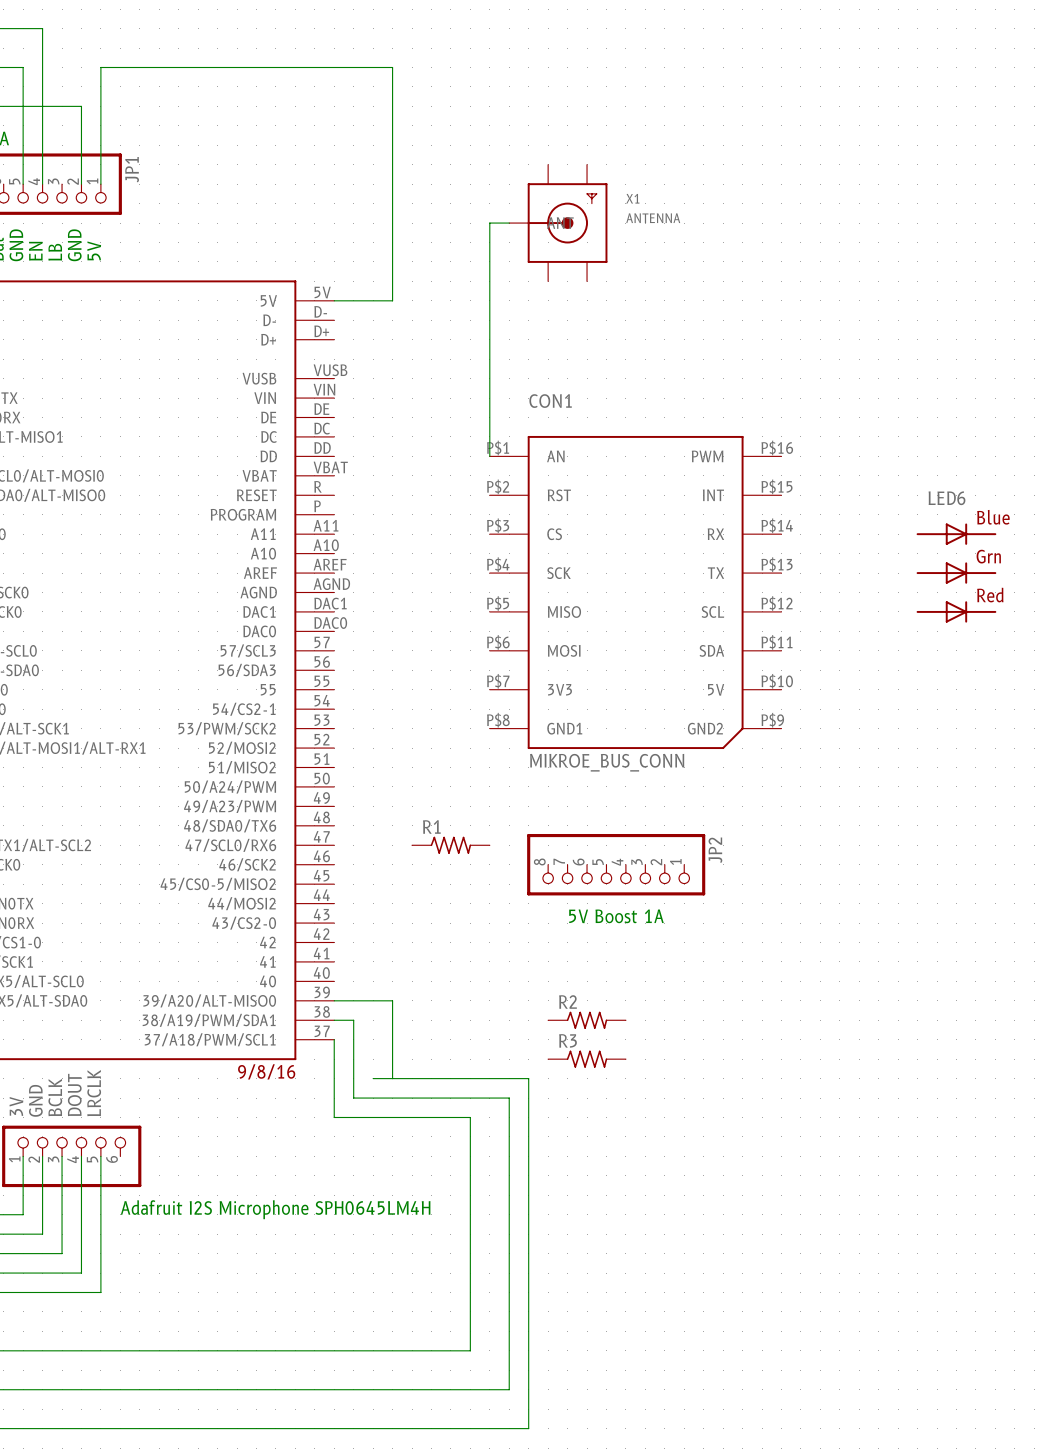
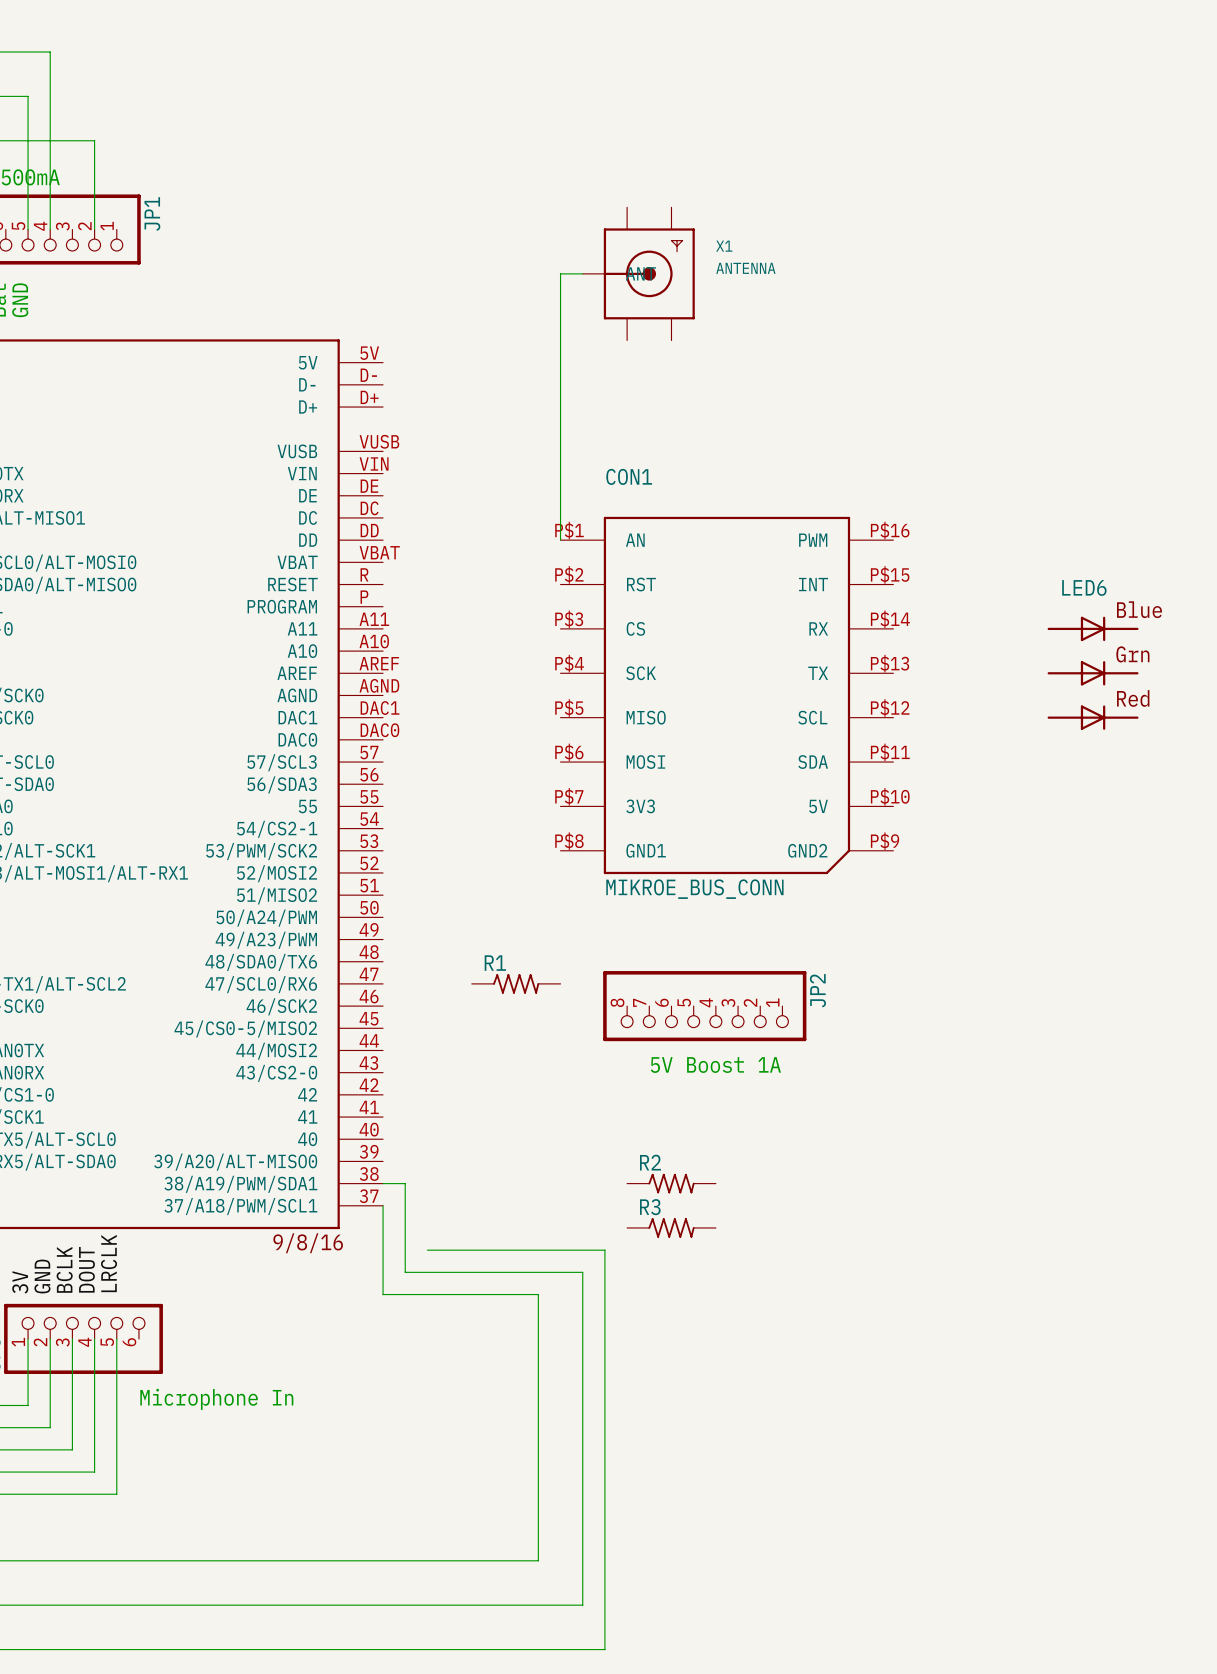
wire: (100, 184) (100, 67) (392, 67) (392, 300) (334, 300) -> none
text: GND (74, 245) -> none
text: 5V (94, 250) -> none
text: EN (35, 251) -> none
text: LB (55, 252) -> none
wire: (334, 1000) (392, 1000) (392, 1078) -> none
text: Adafruit I2S Microphone SPH0645LM4H (275, 1209) -> Microphone In (216, 1399)

